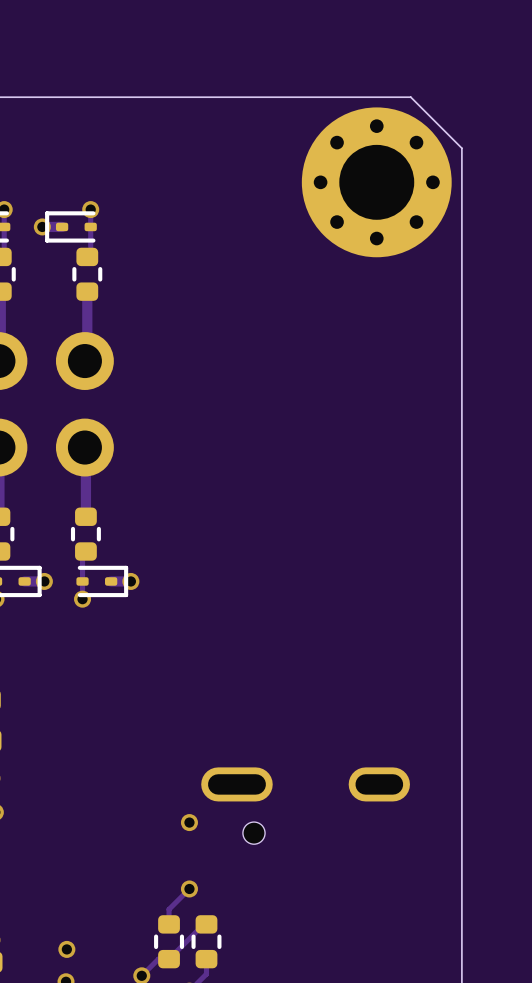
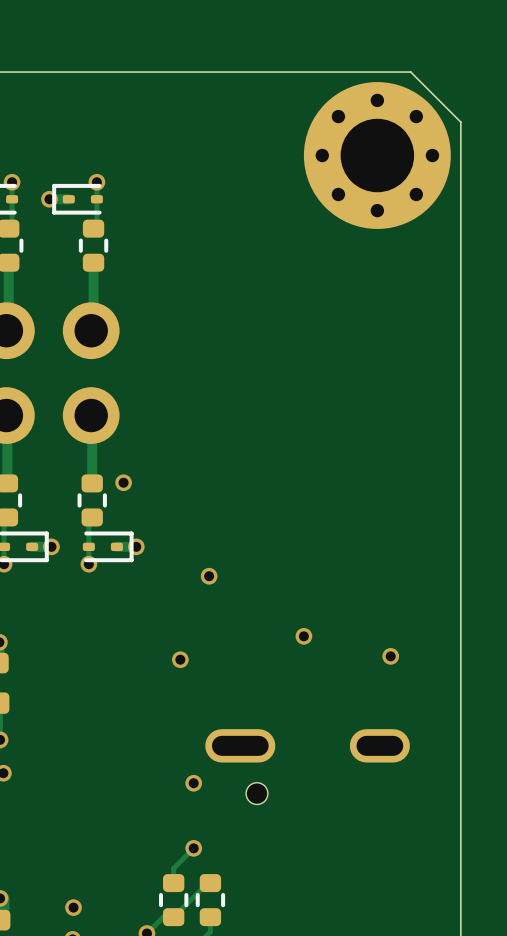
via: none -> (123, 482)
via: none -> (209, 576)
via: none -> (303, 636)
via: none -> (390, 656)
via: none -> (180, 659)

